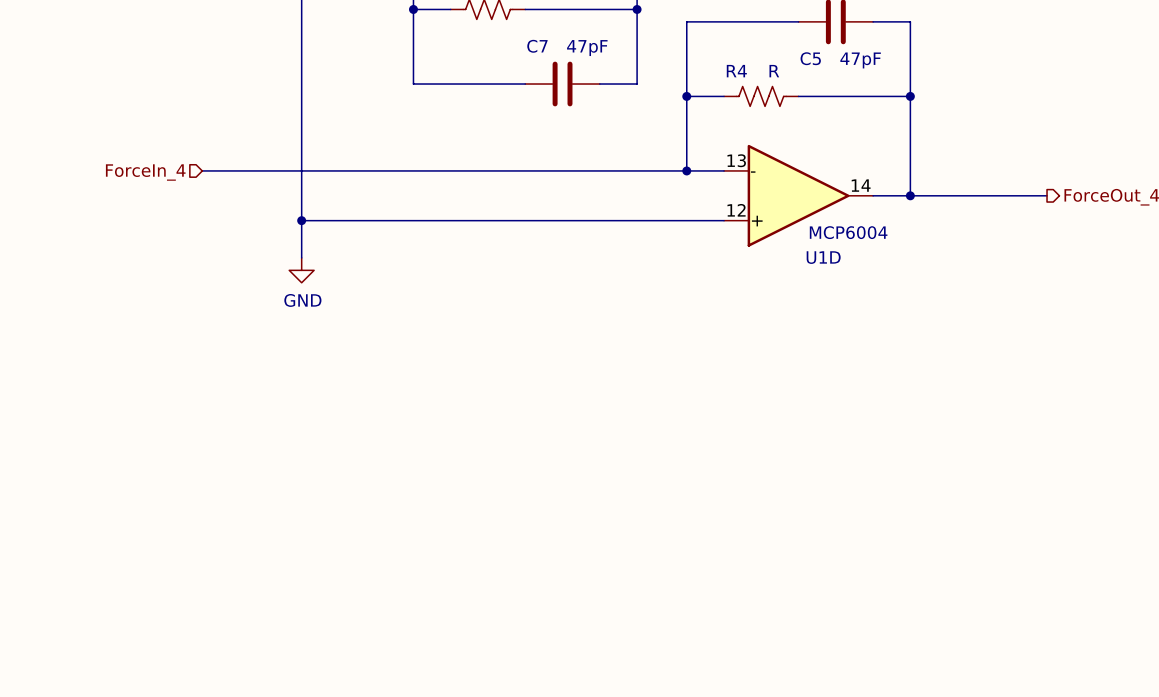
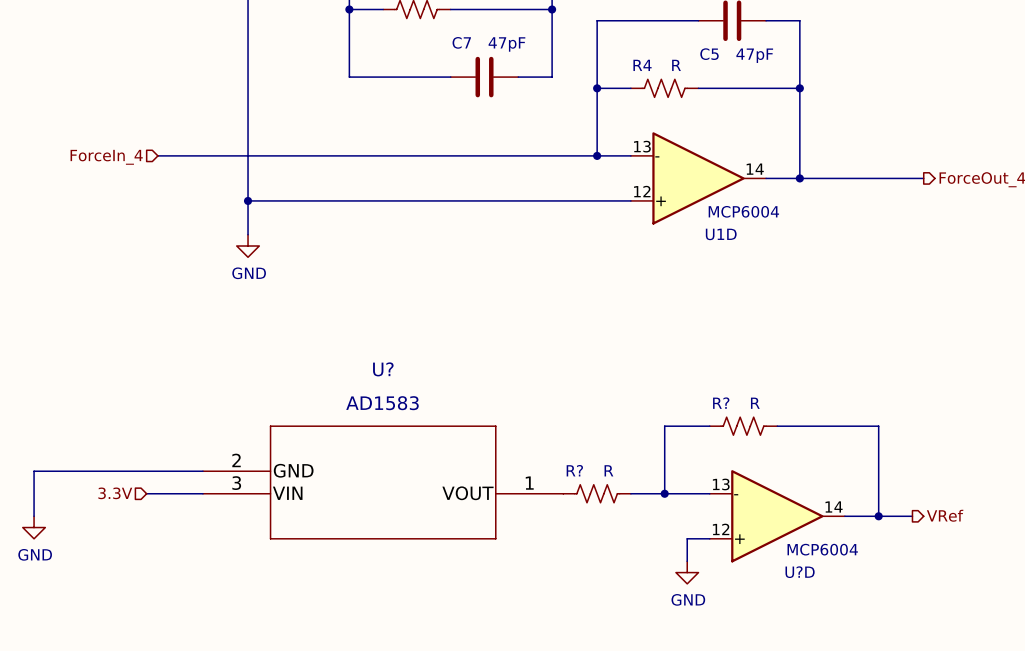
wire: none -> (709, 426) (664, 426) (664, 493)
R?: none -> R (743, 426)
wire: none -> (777, 426) (878, 426) (878, 516)
wire: none -> (202, 471) (34, 471) (34, 516)
U?: none -> AD1583 (383, 482)
hierarchical label: none -> 3.3V (115, 493)
wire: none -> (146, 493) (202, 493)
R?: none -> R (597, 493)
wire: none -> (630, 493) (709, 493)
junction: none -> (664, 493)
hierarchical label: none -> VRef (945, 515)
U?D: none -> MCP6004 (777, 516)
wire: none -> (844, 516) (912, 516)
junction: none -> (878, 516)
power symbol: none -> GND (34, 527)
wire: none -> (709, 538) (687, 538) (687, 561)
power symbol: none -> GND (687, 572)

